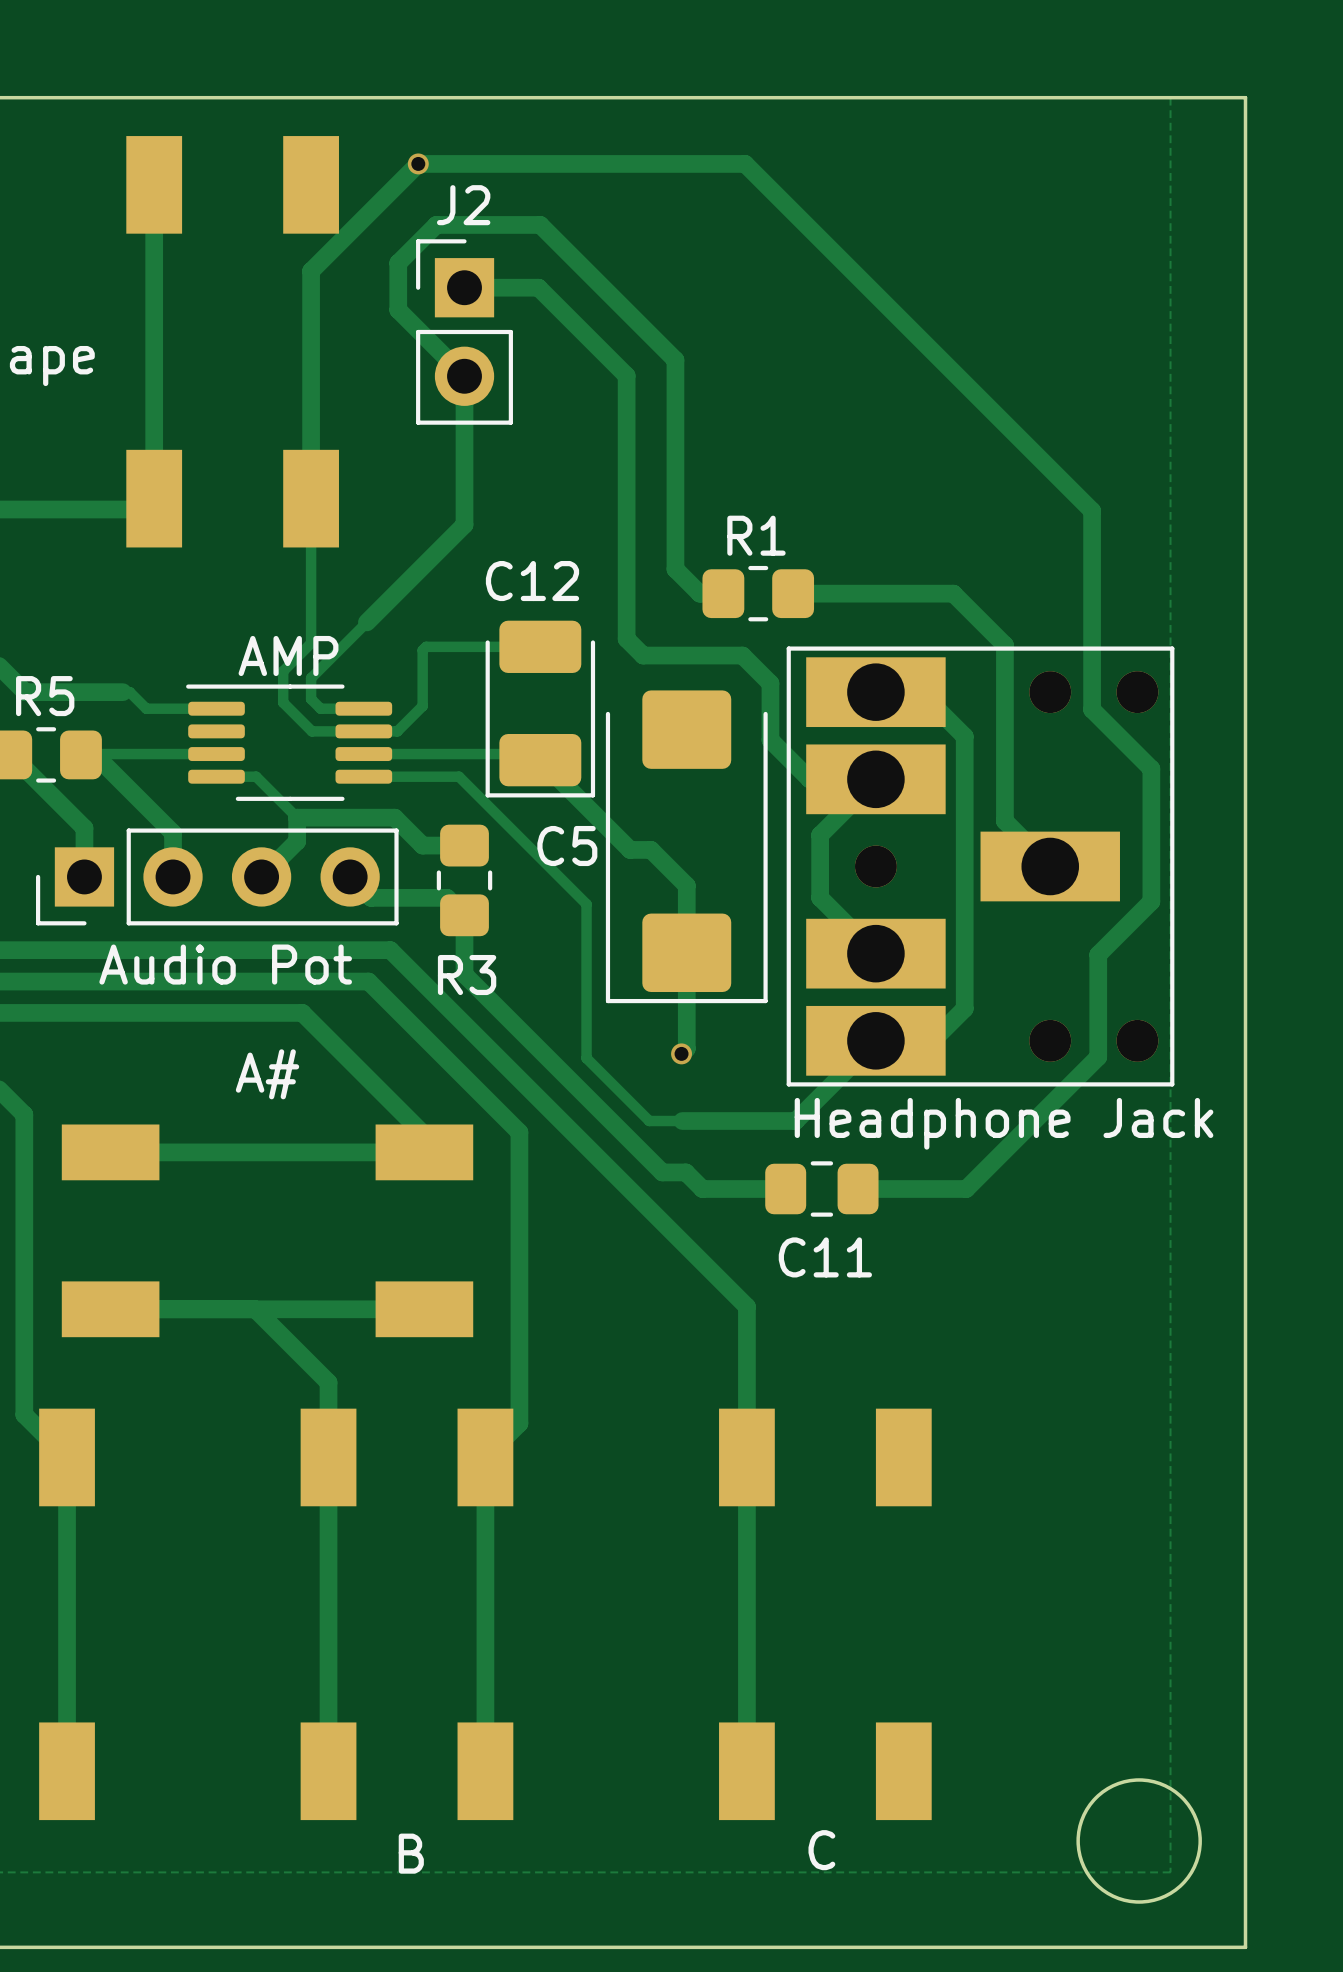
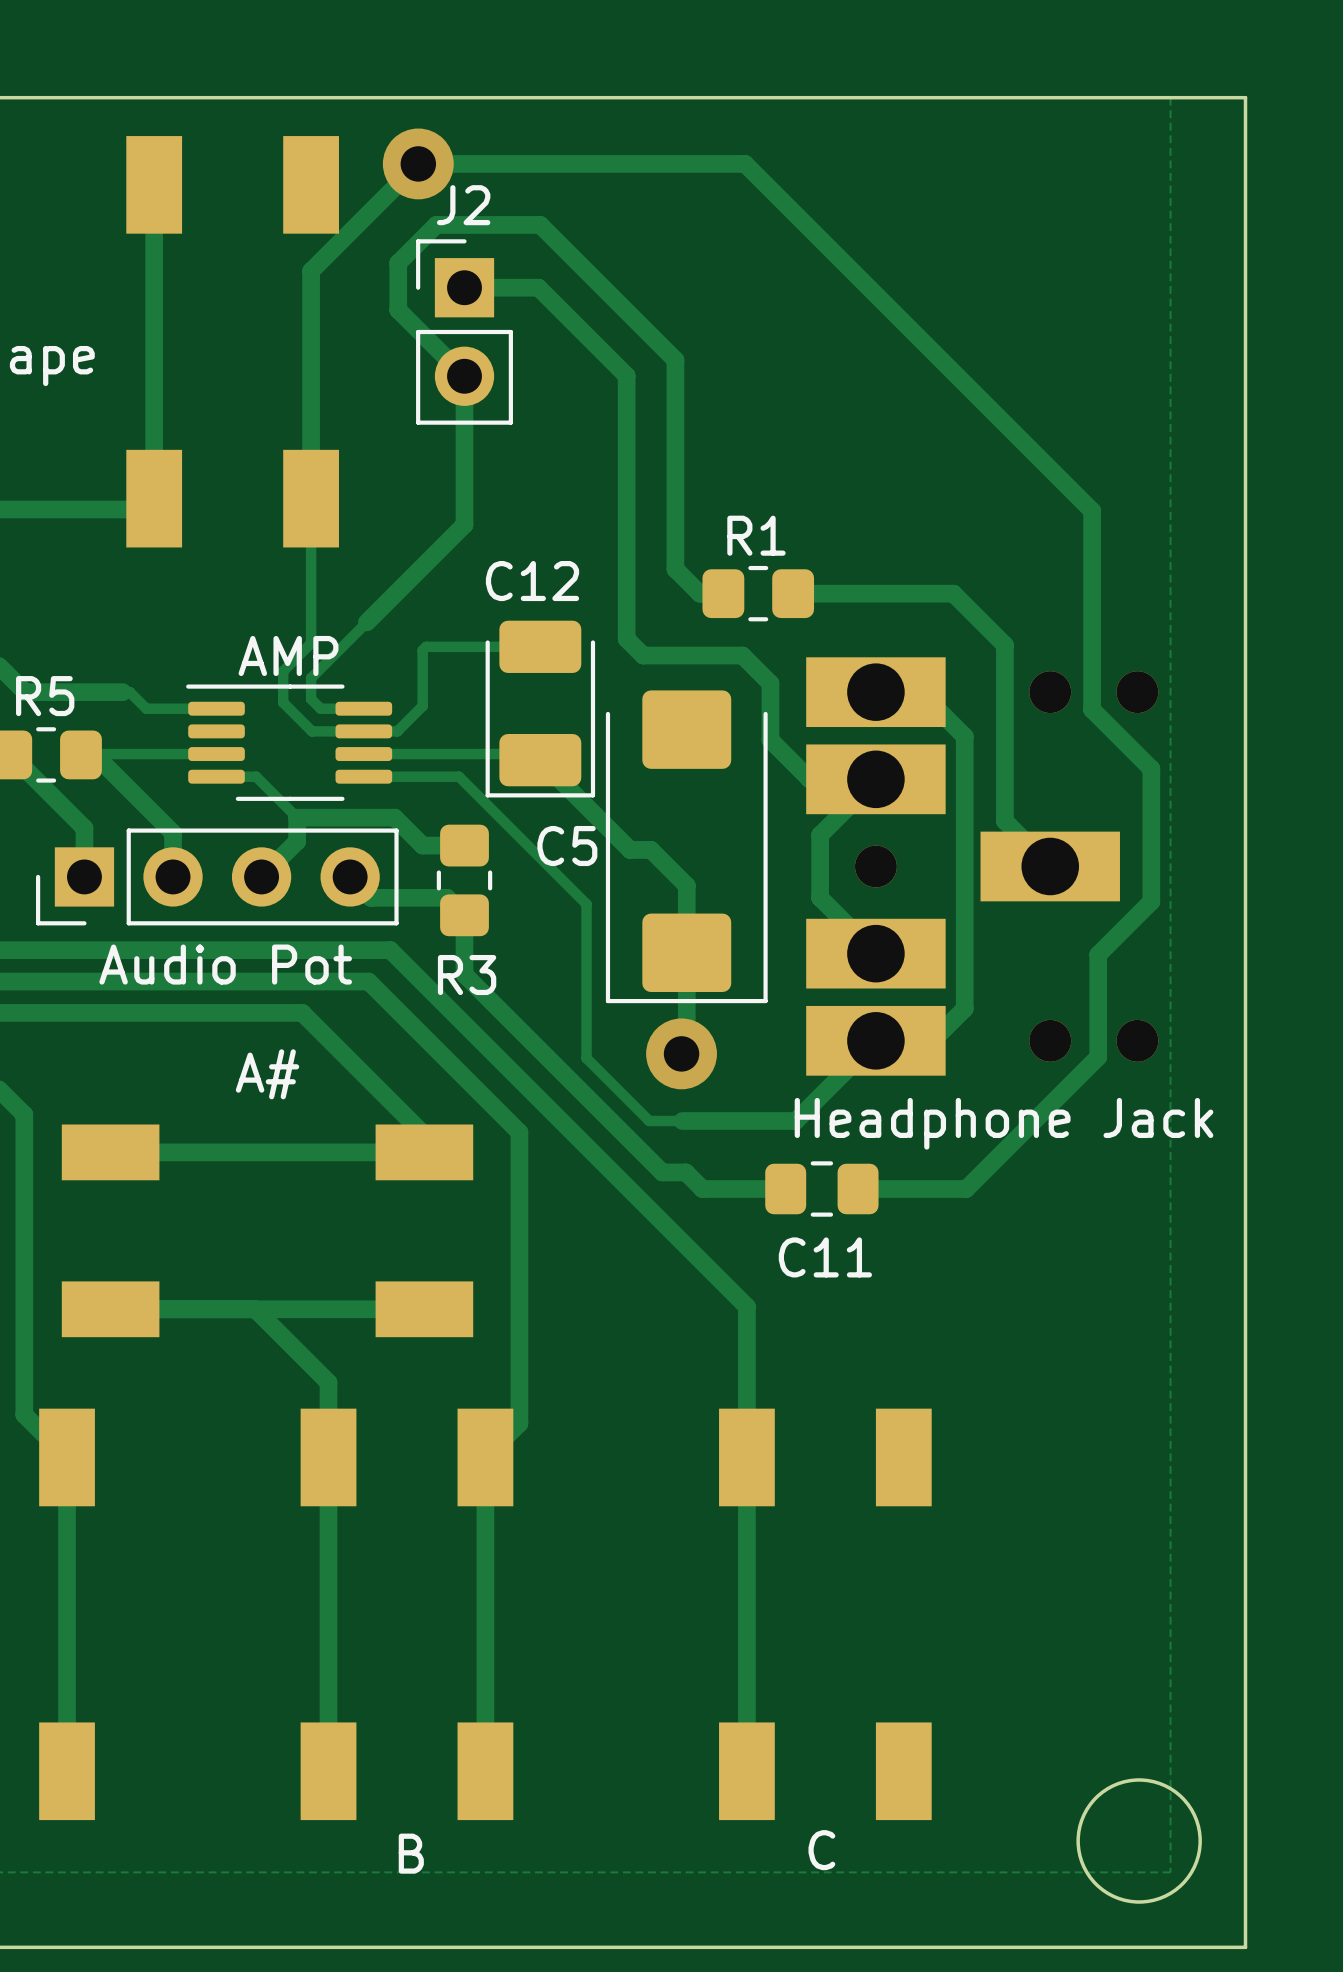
via size: [407, 153, 429, 175] -> [382, 128, 454, 200]
Headphone Jack footprint: [786, 646, 1175, 1087] -> [806, 657, 1159, 1076]
via size: [671, 1043, 693, 1065] -> [646, 1018, 717, 1090]

